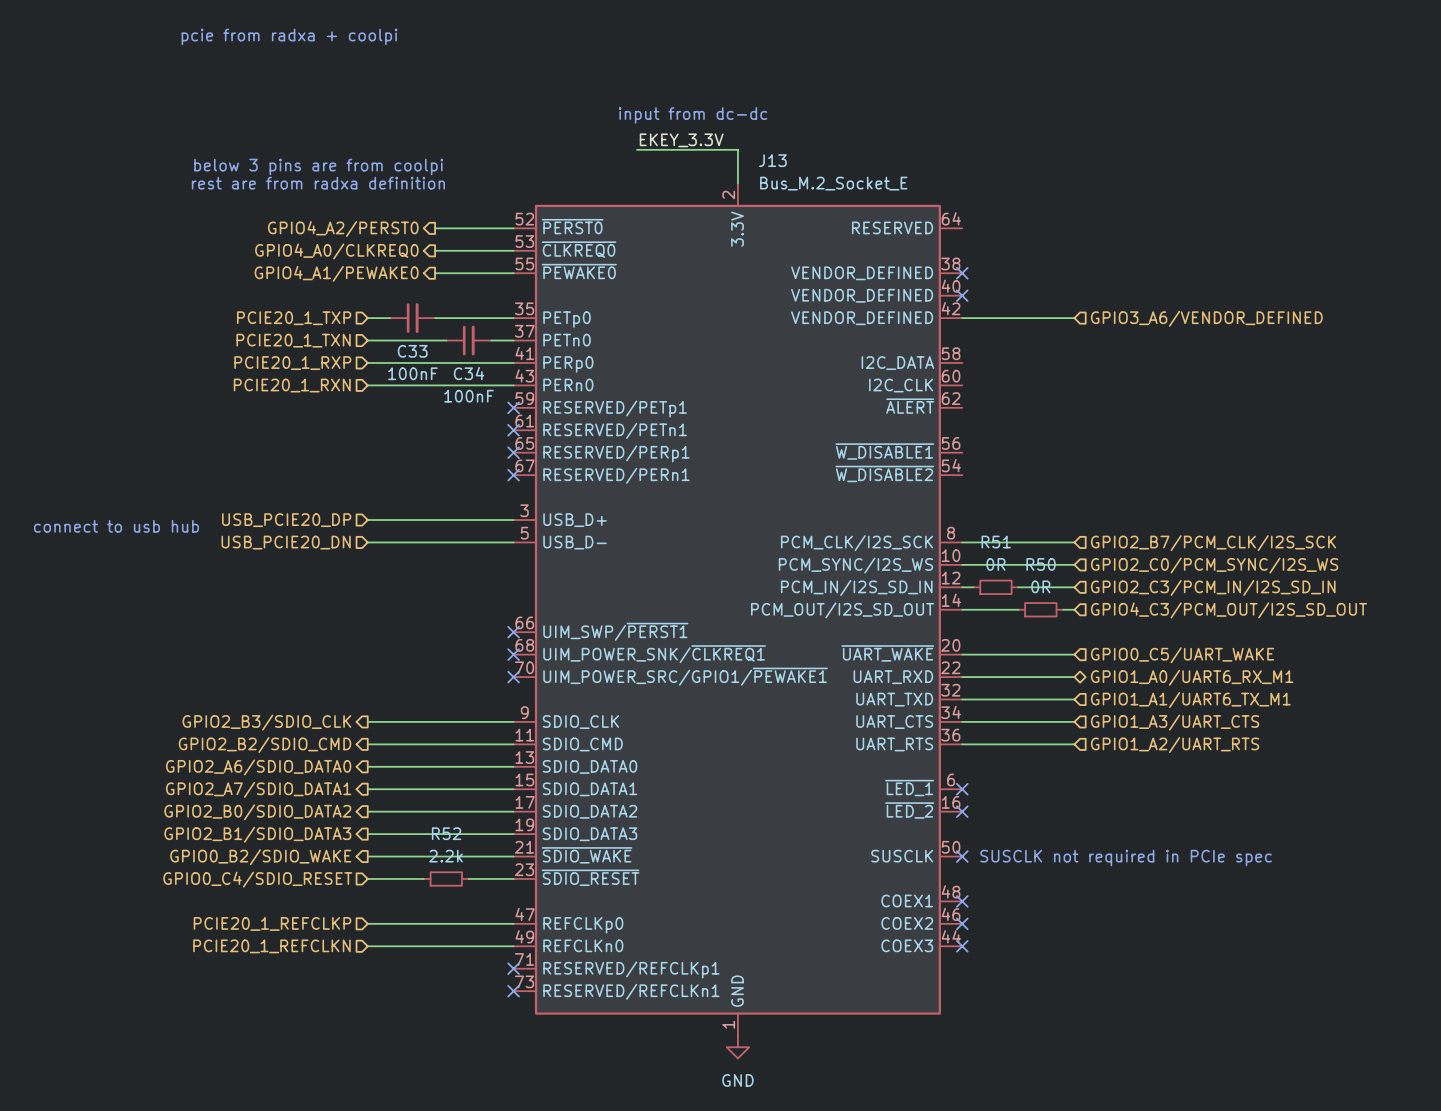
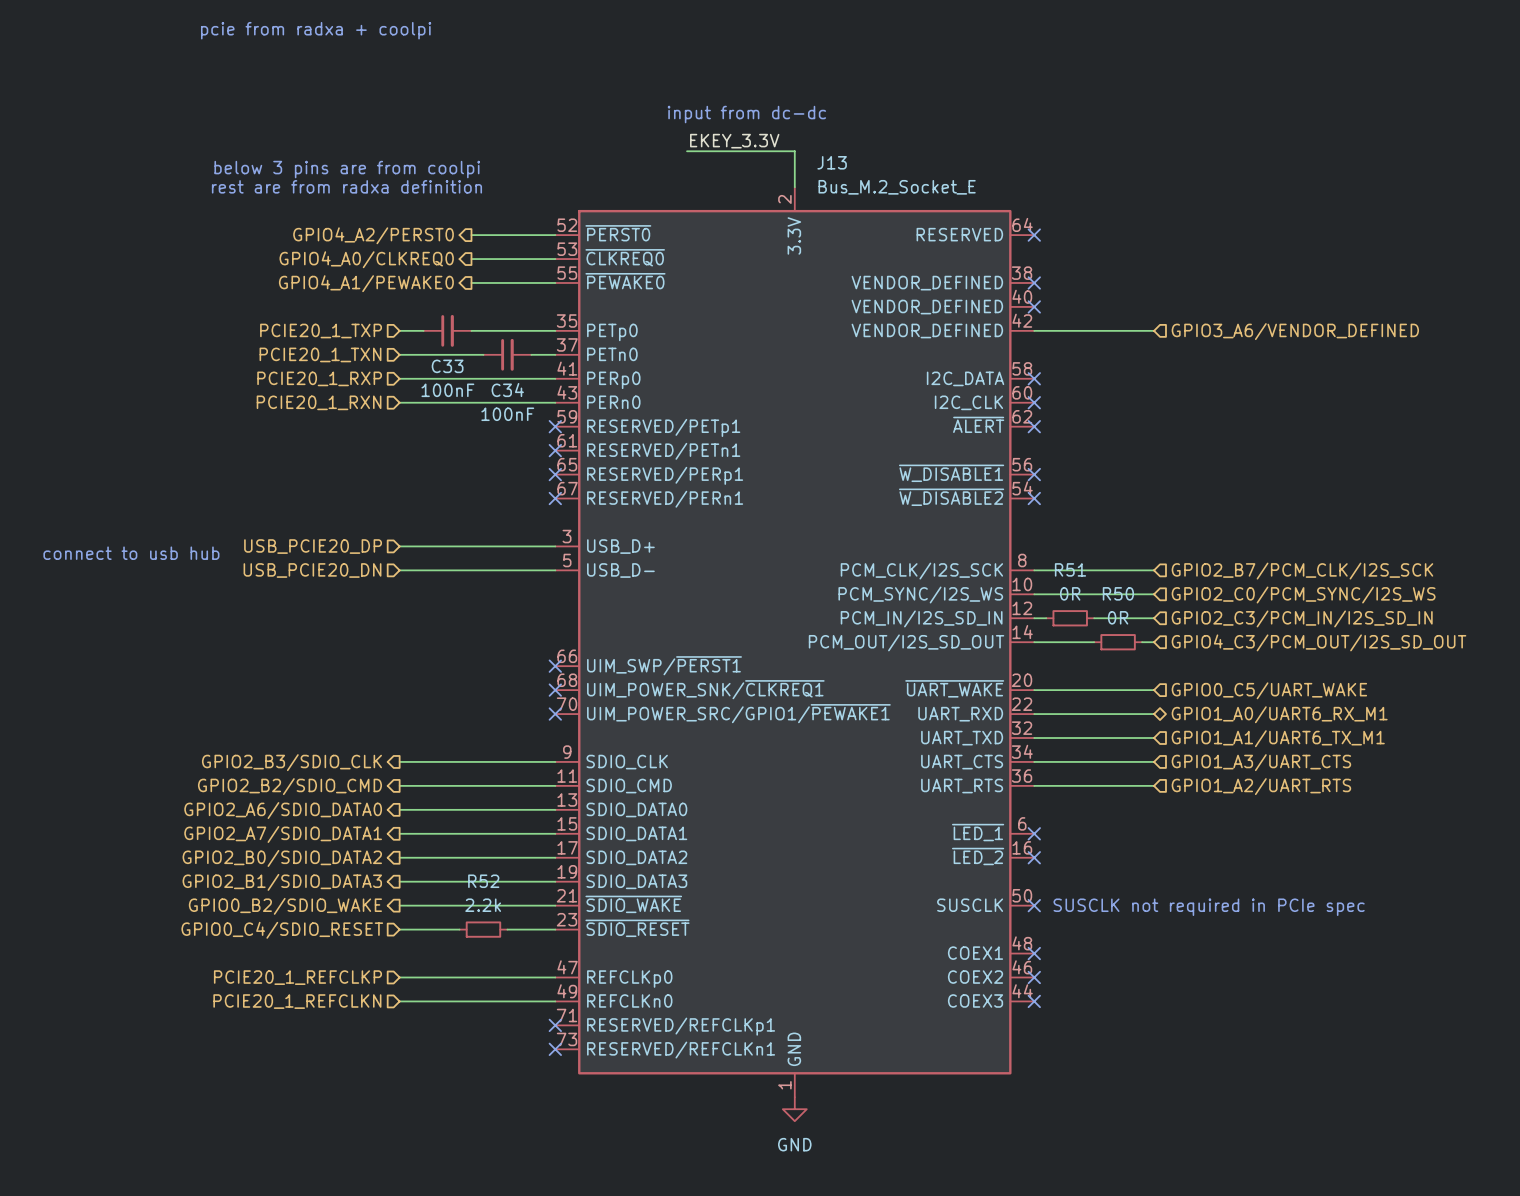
no-connect mark: none -> (1034, 235)
no-connect mark: none -> (1034, 378)
no-connect mark: none -> (1034, 402)
no-connect mark: none -> (1034, 426)
no-connect mark: none -> (1034, 474)
no-connect mark: none -> (1034, 498)

